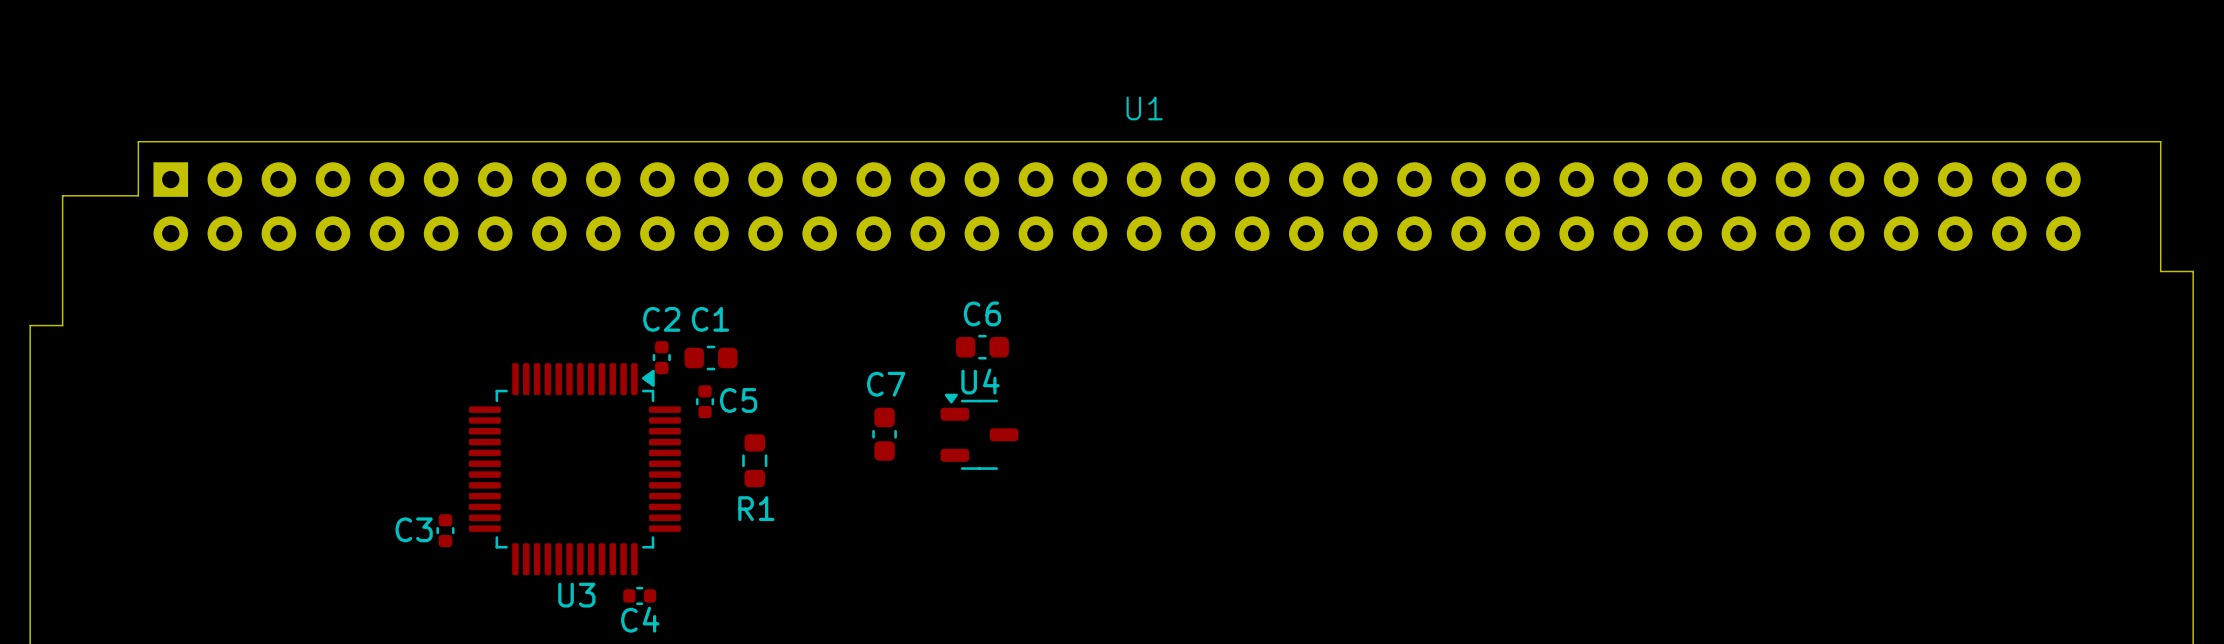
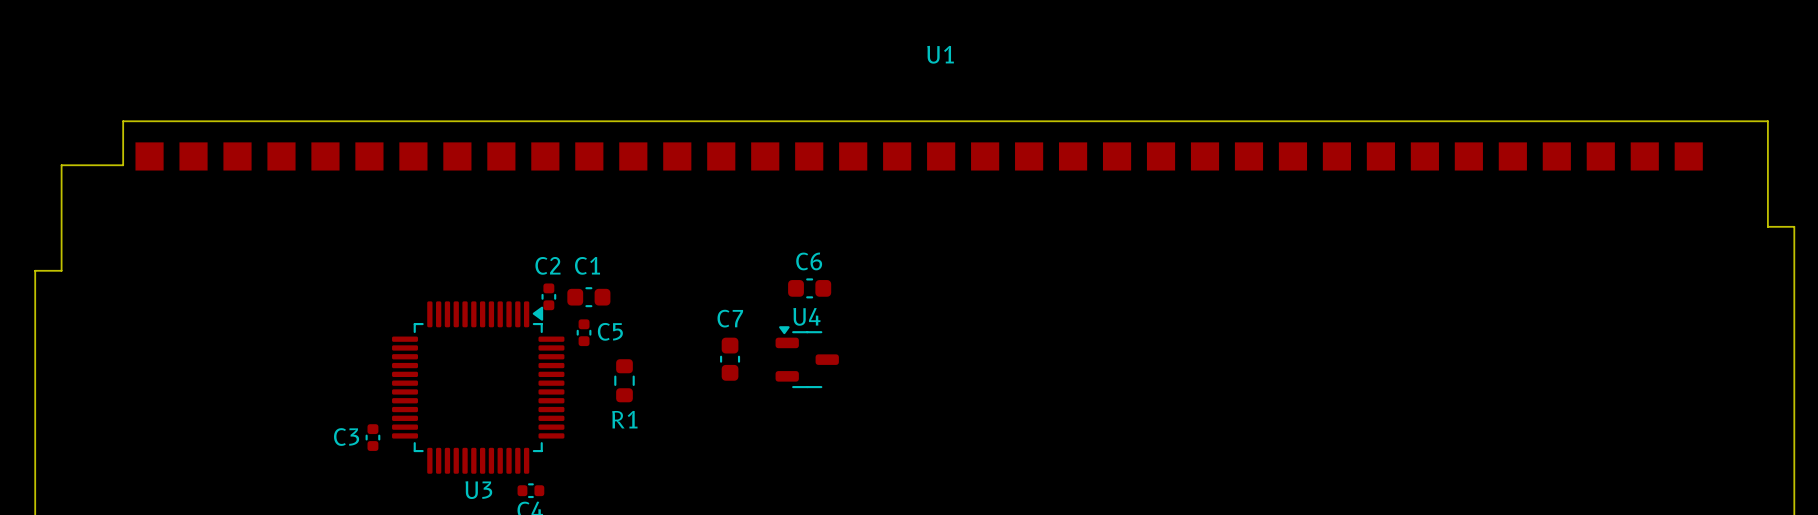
U1 footprint: [153, 162, 2081, 251] -> [135, 142, 1703, 171]

